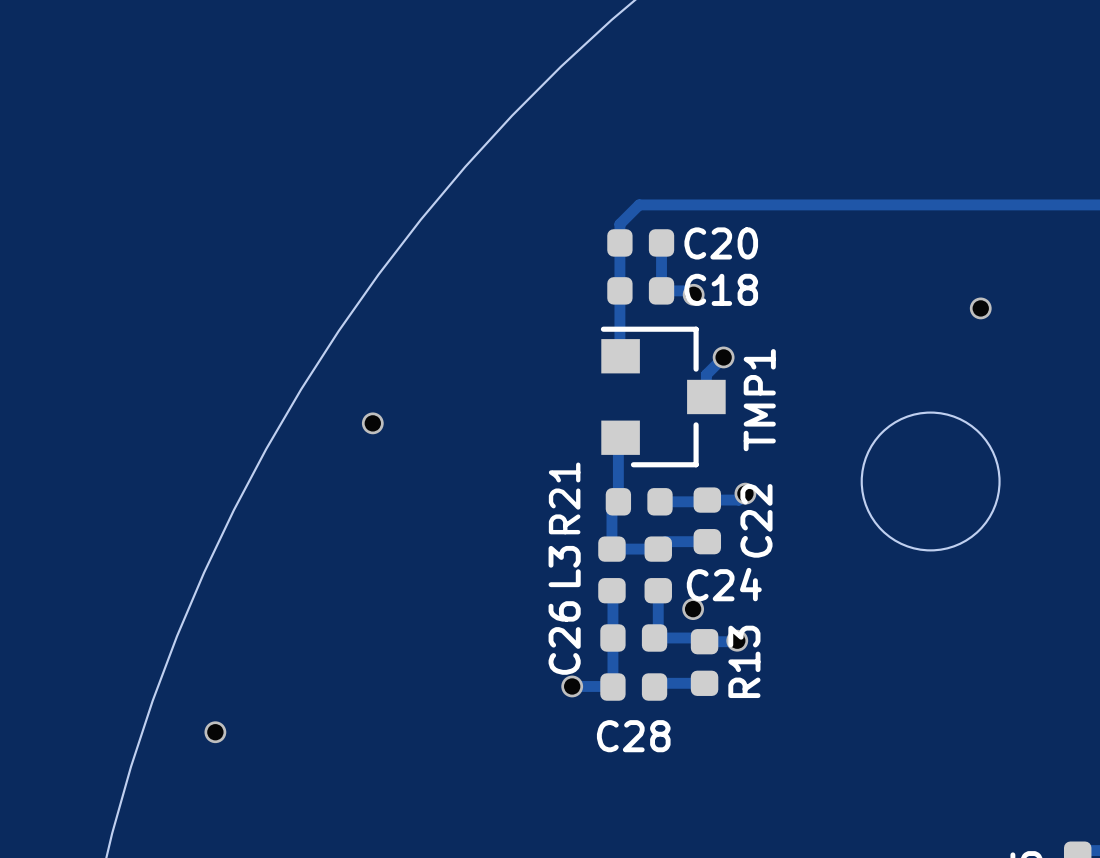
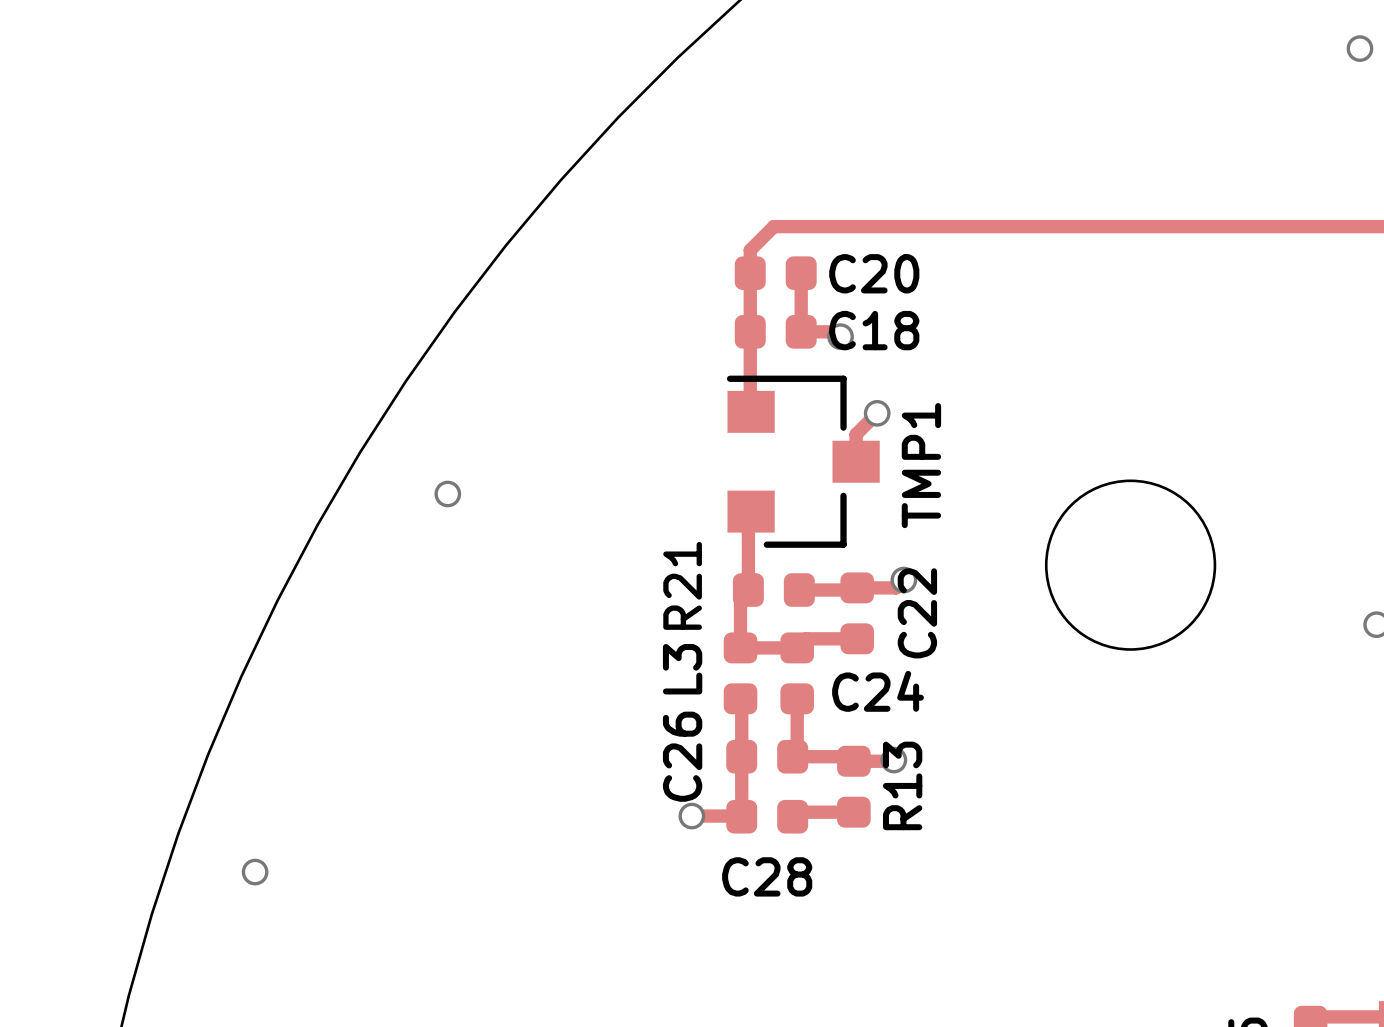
via: (980, 308) -> none
via: (693, 609) -> none

